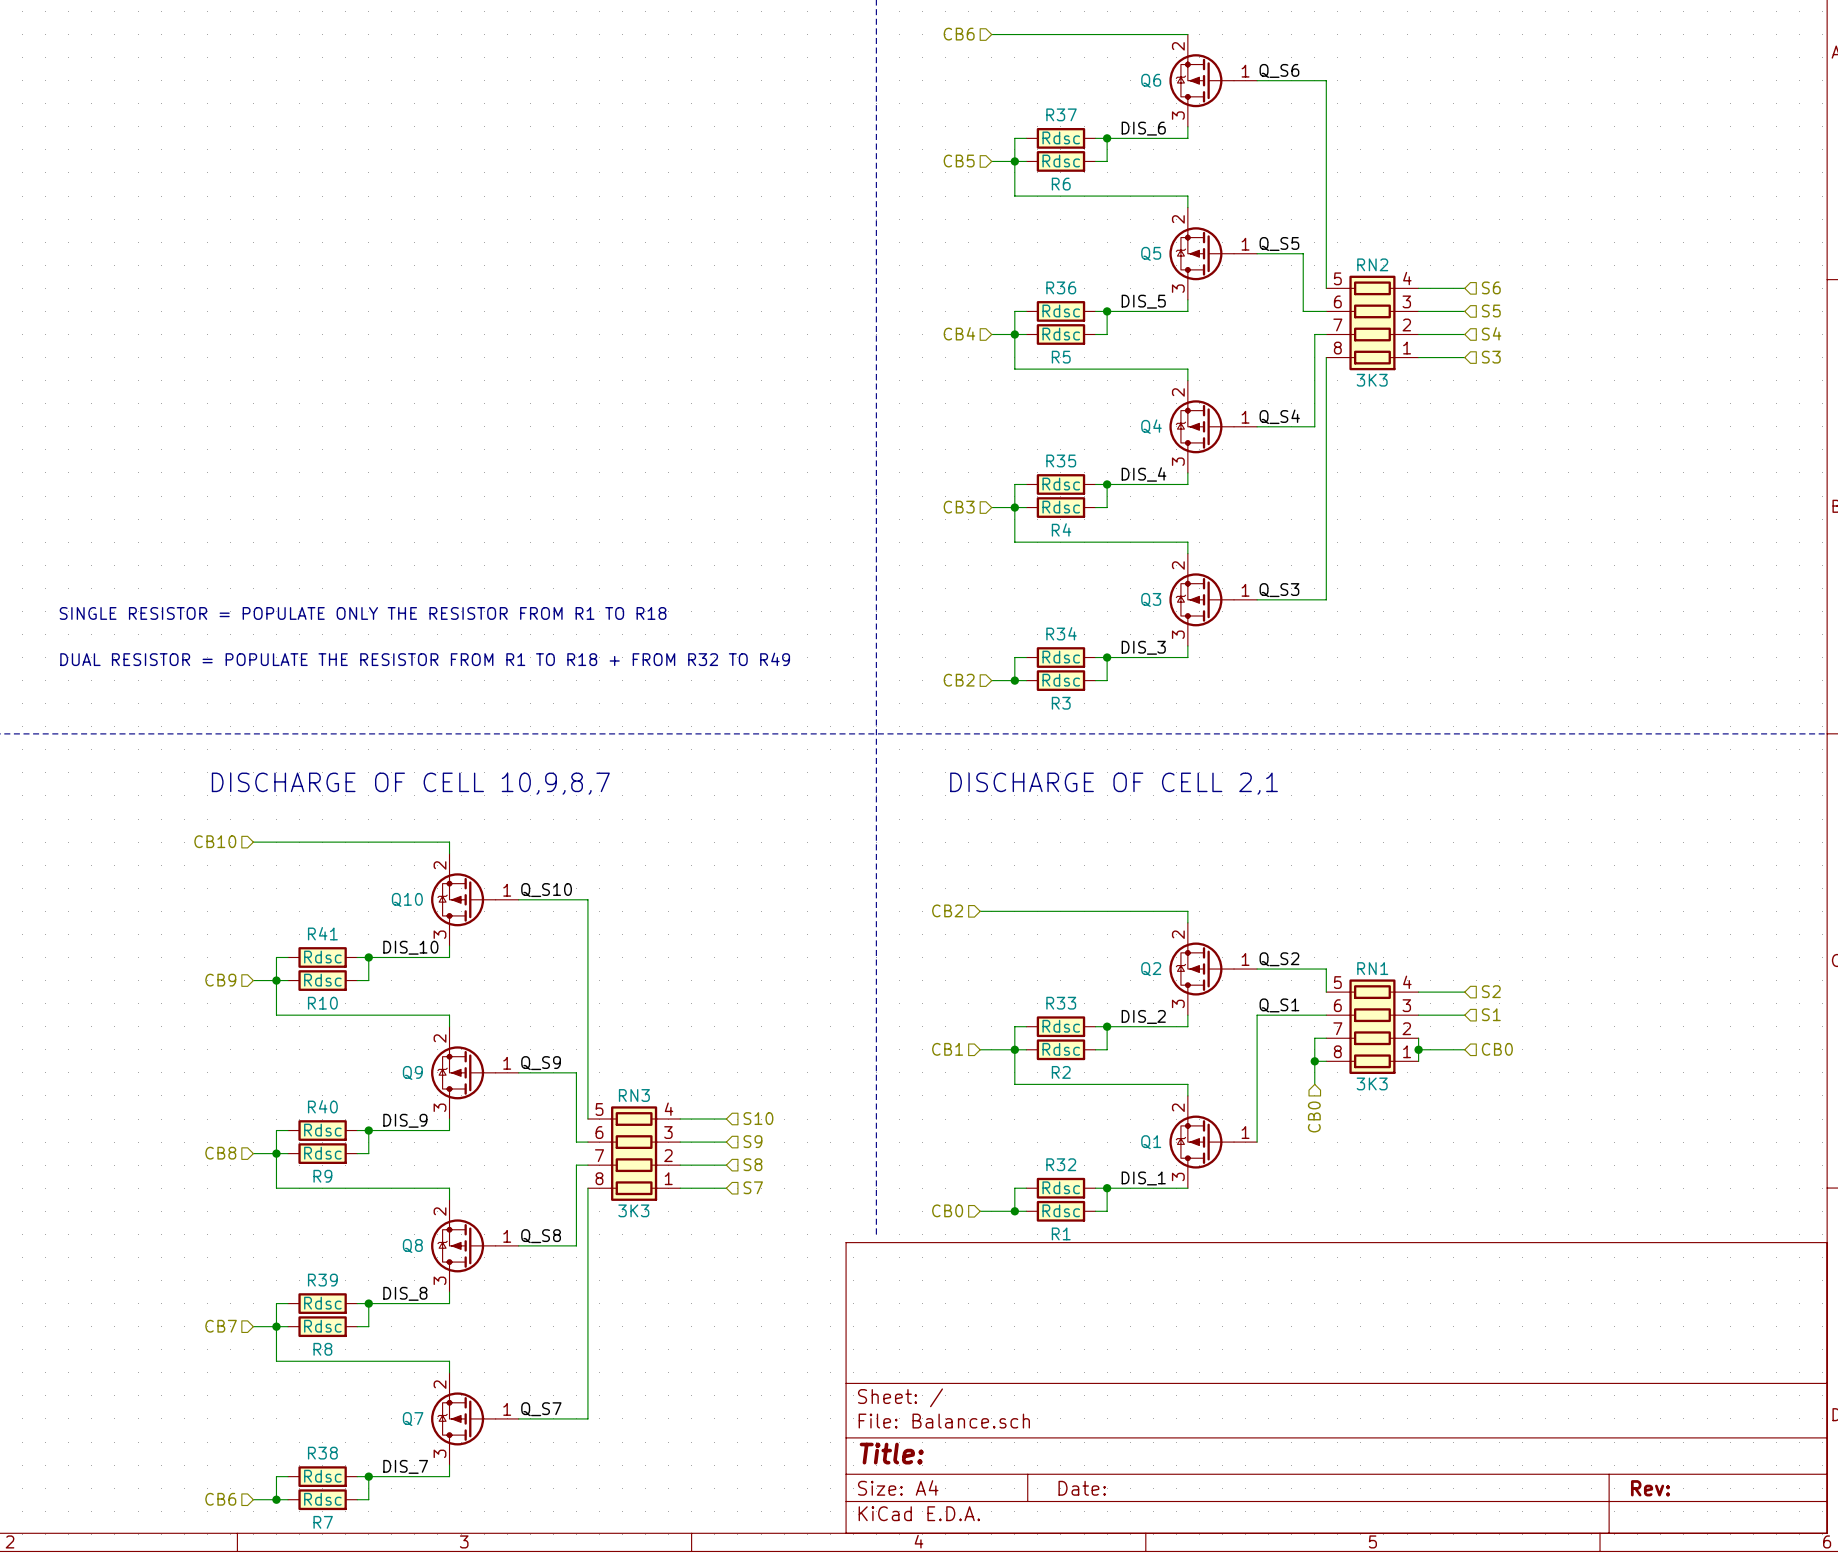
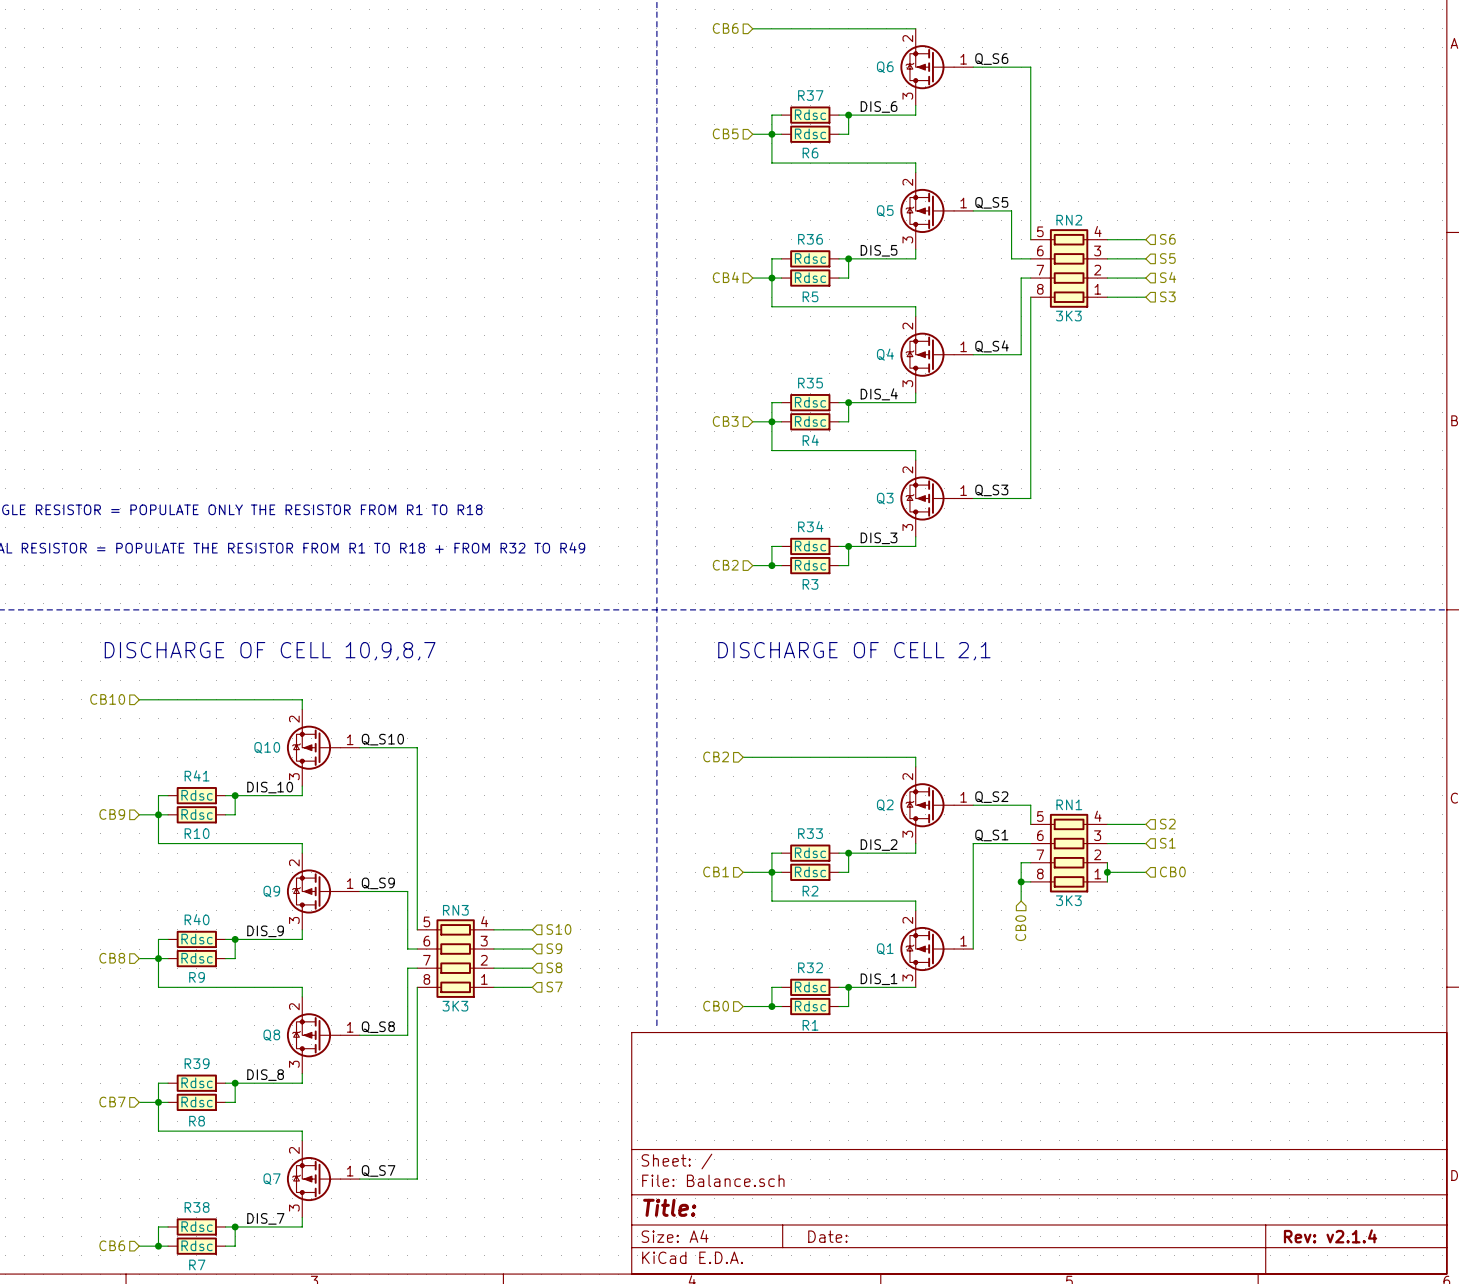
title block: Rev: (1650, 1488) -> Rev: v2.1.4 (1330, 1236)

